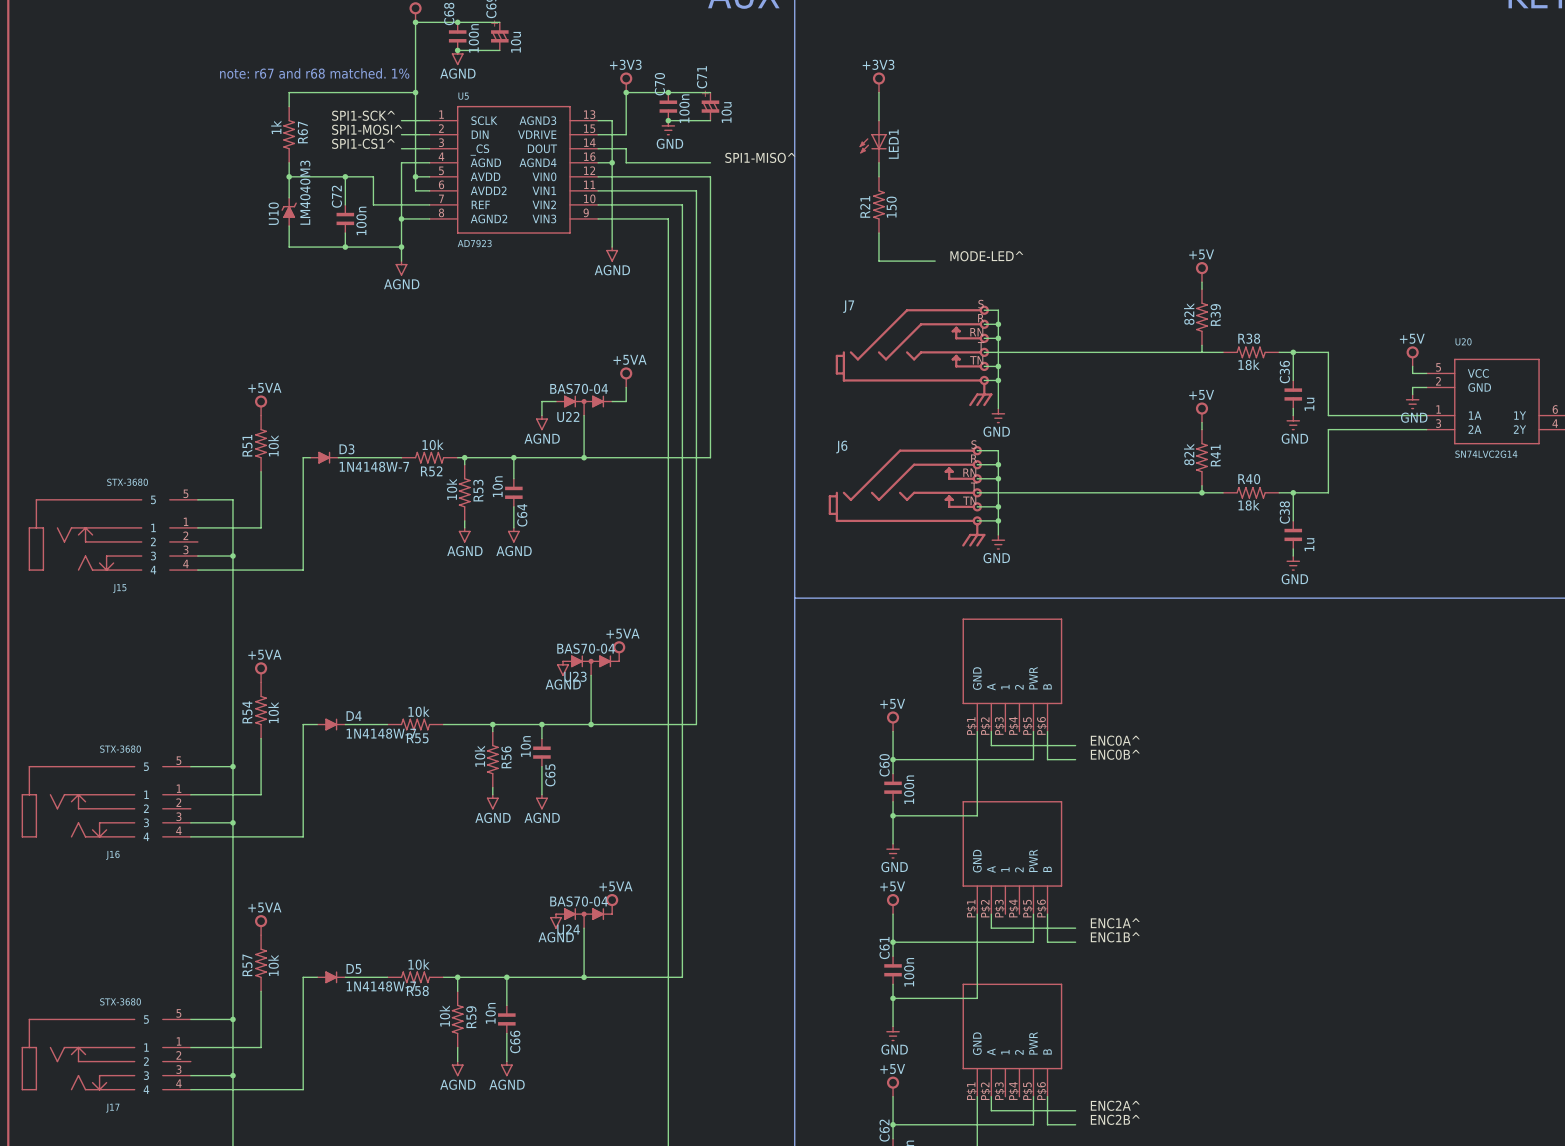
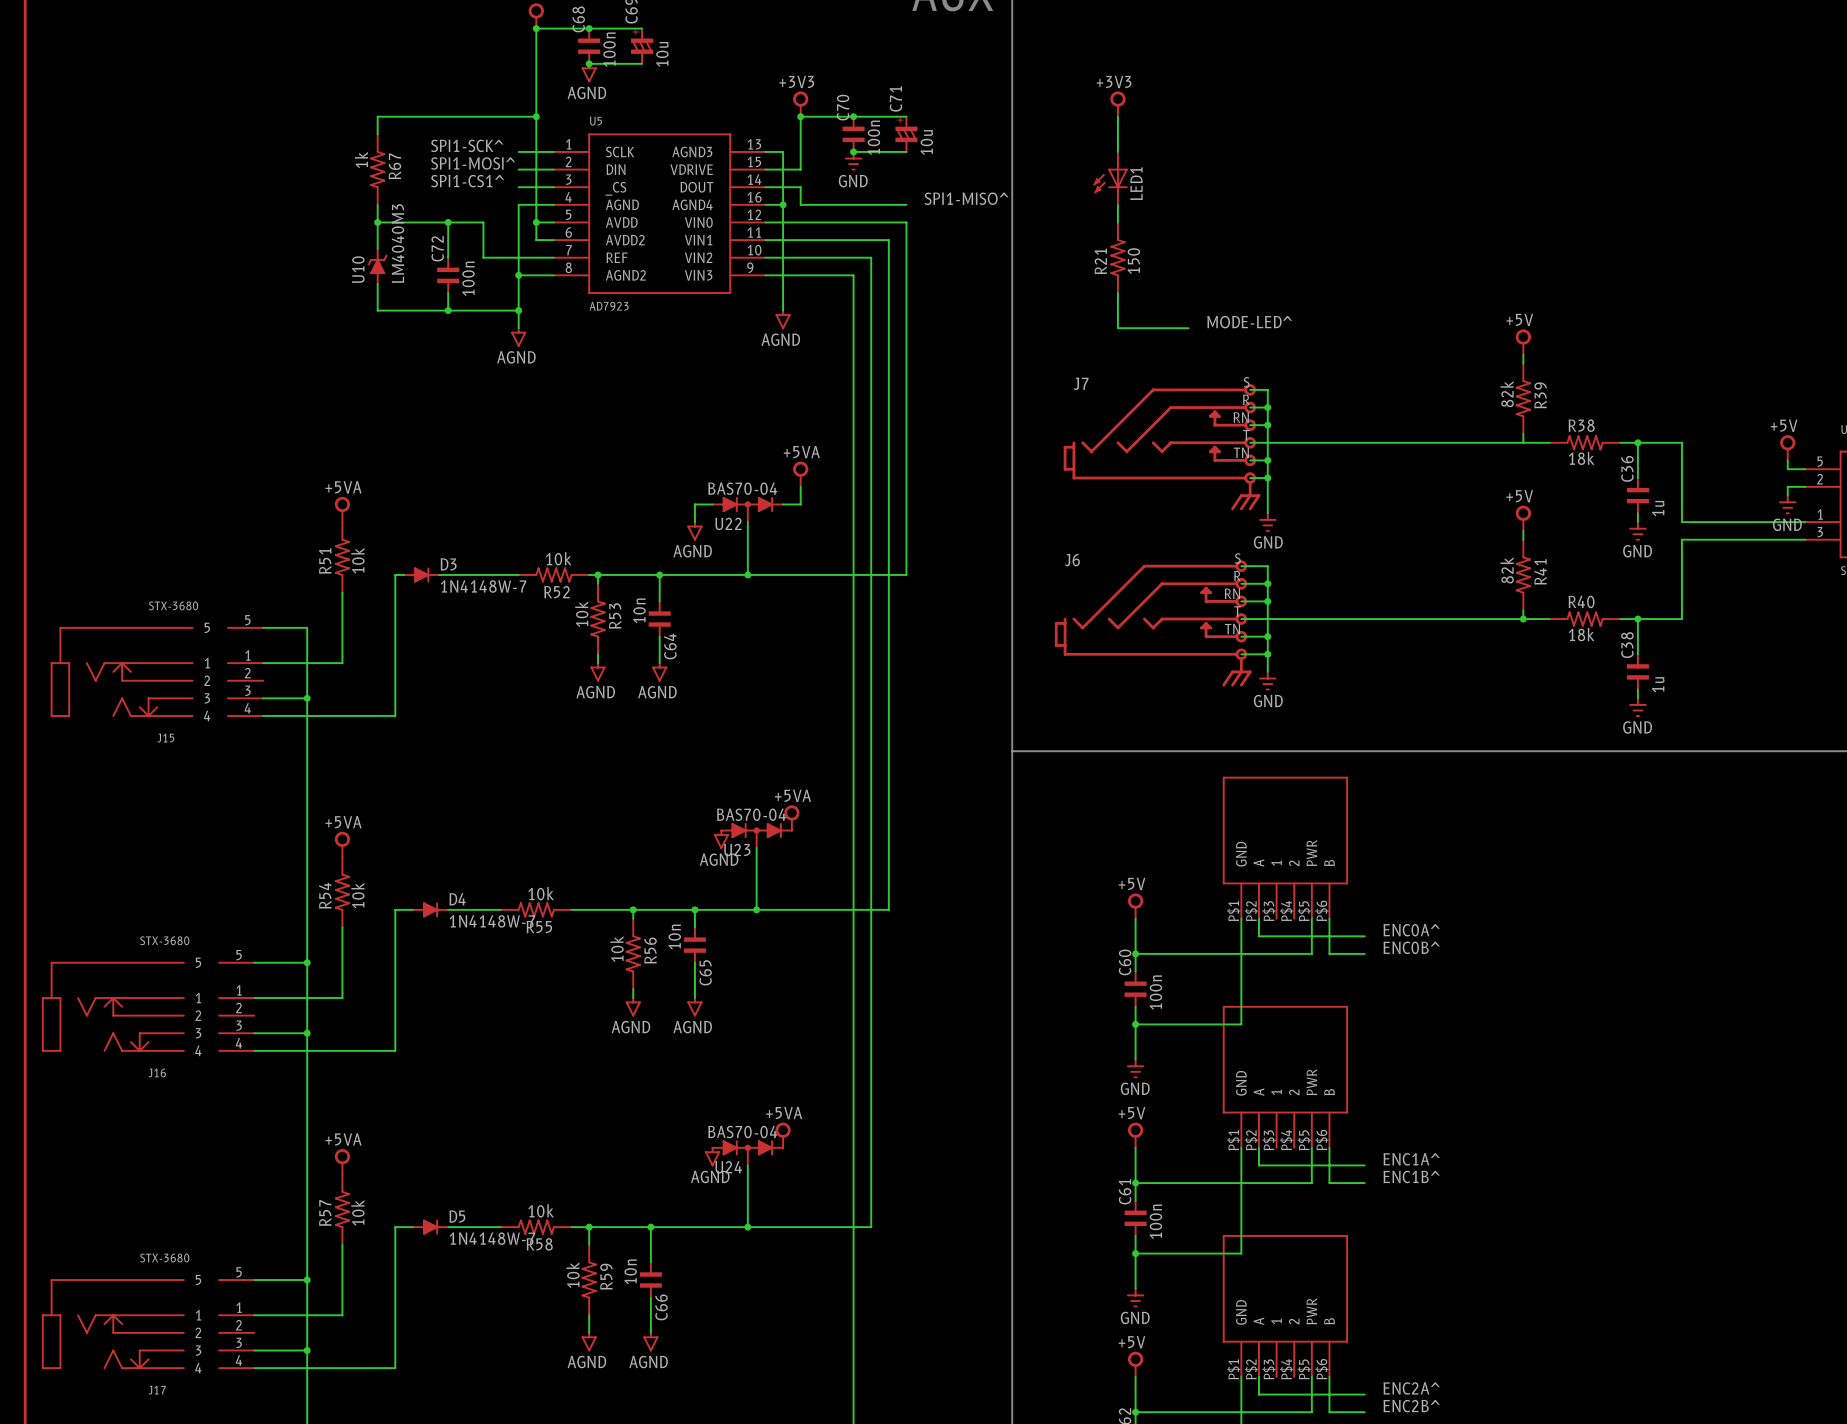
text: note: r67 and r68 matched. 1% (314, 73) -> none

